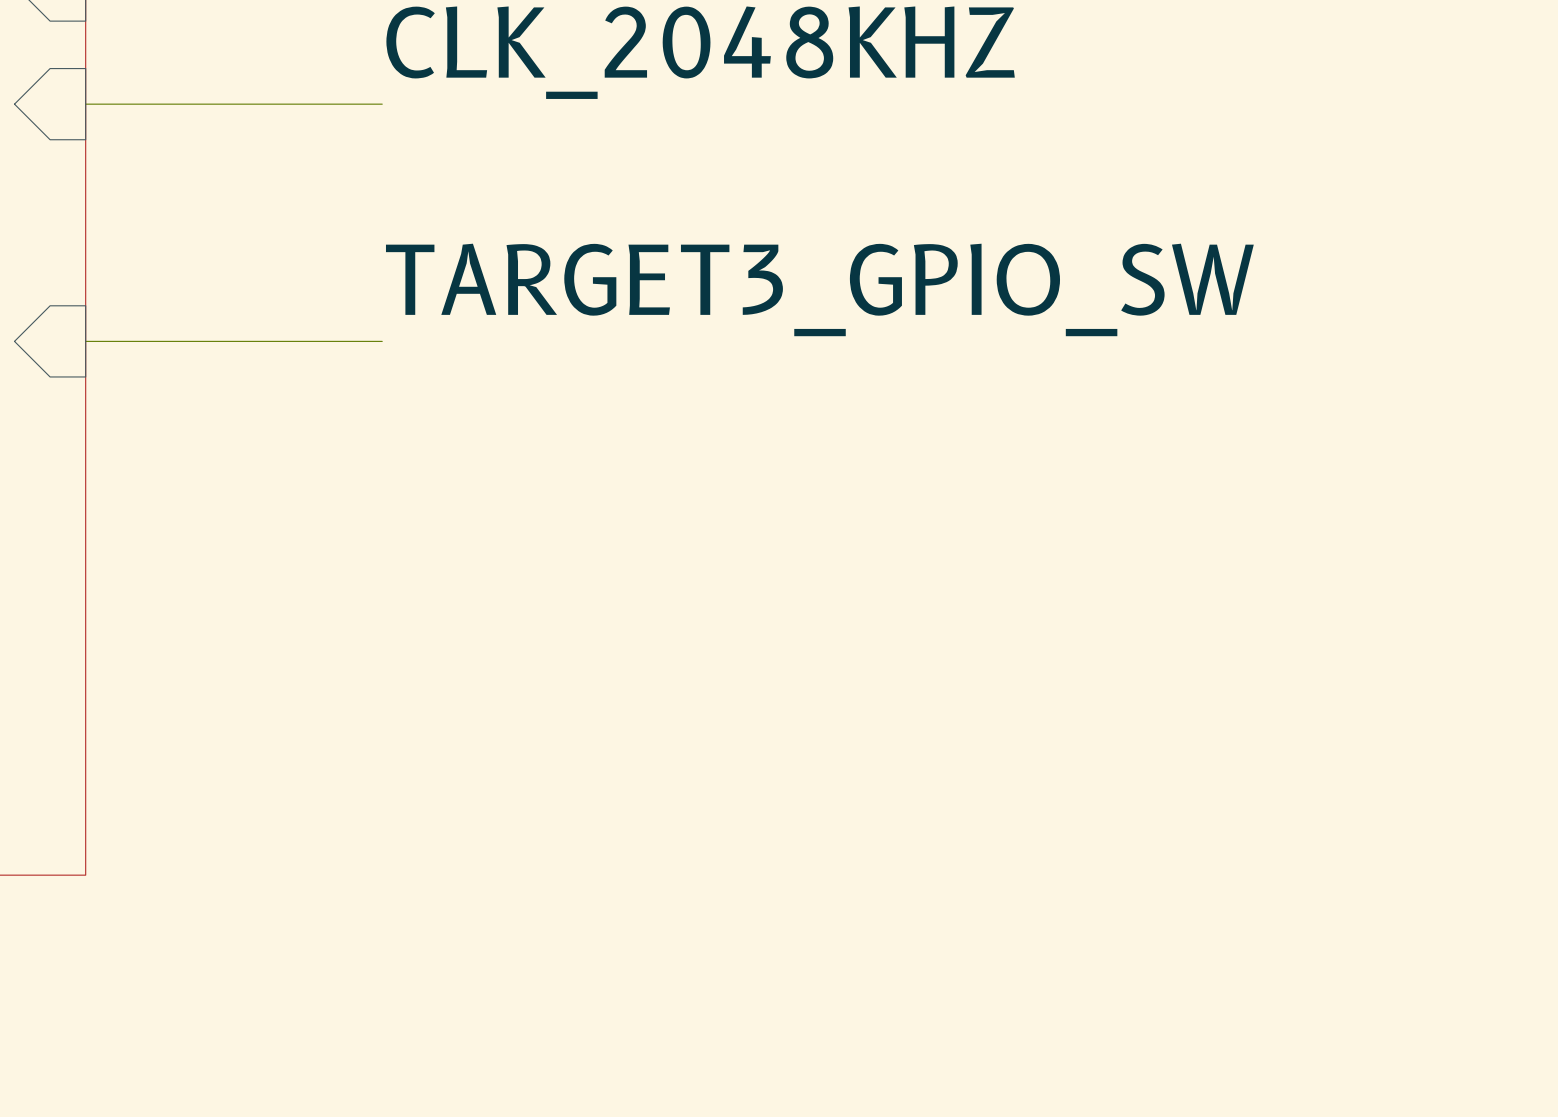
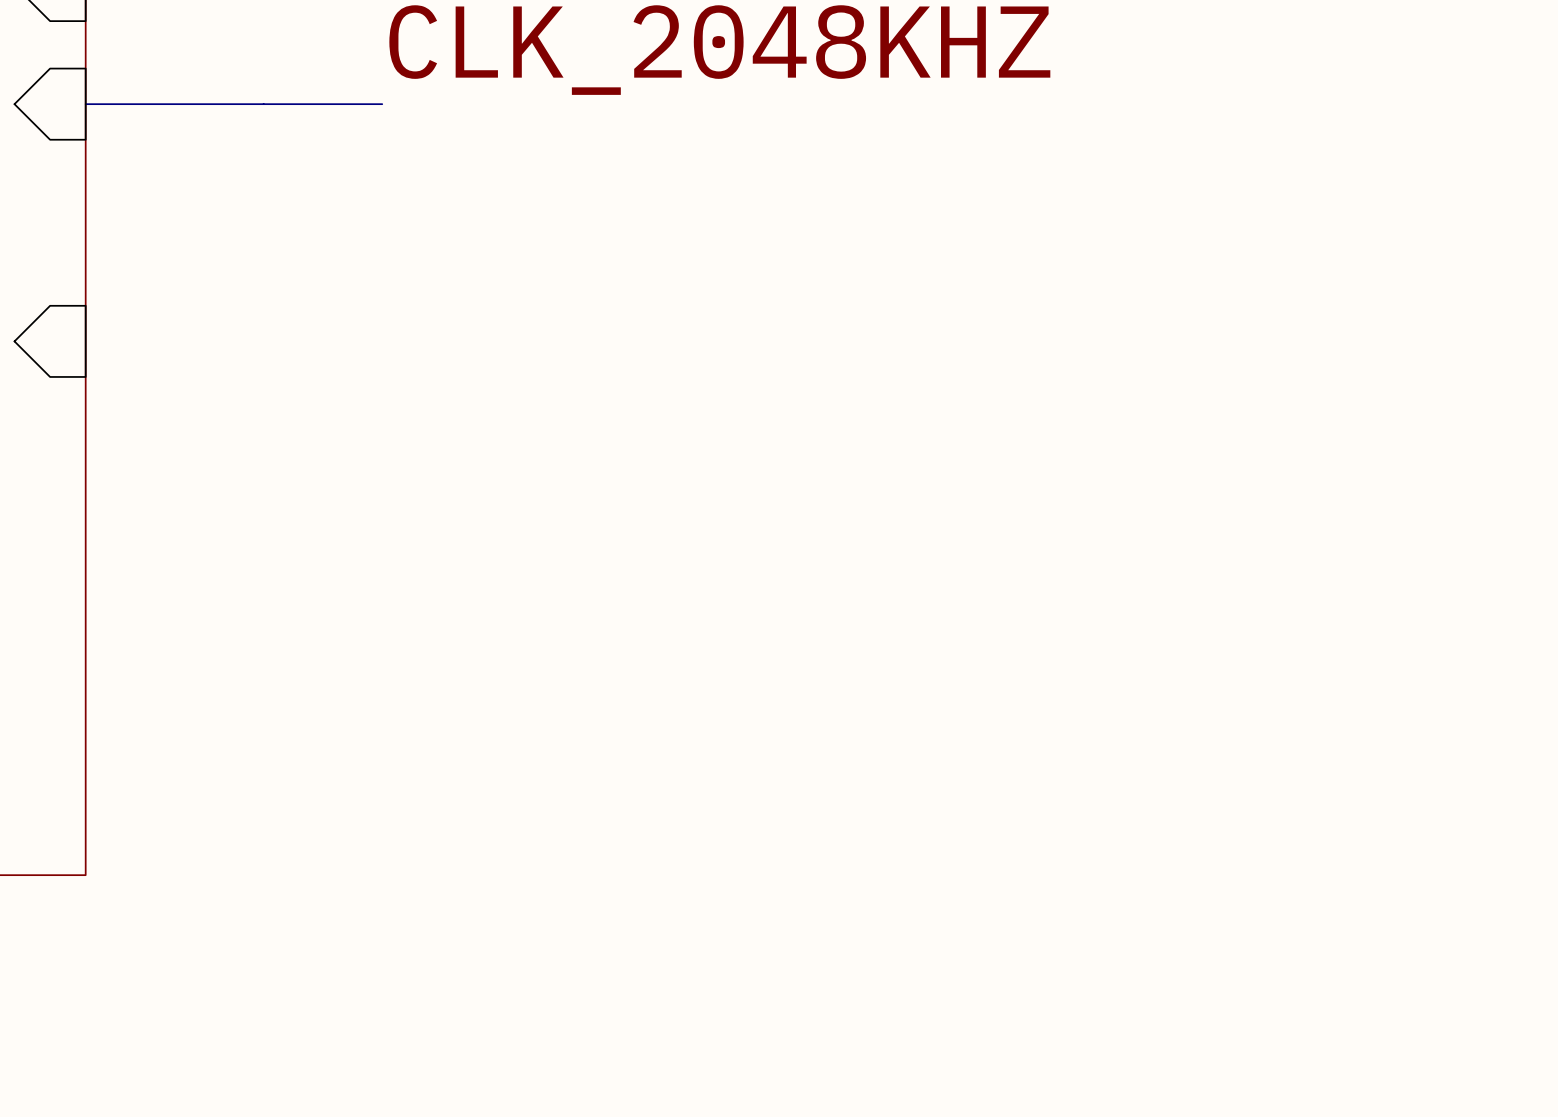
label: TARGET3_GPIO_SW (819, 289) -> none
wire: (85, 341) (382, 341) -> none

